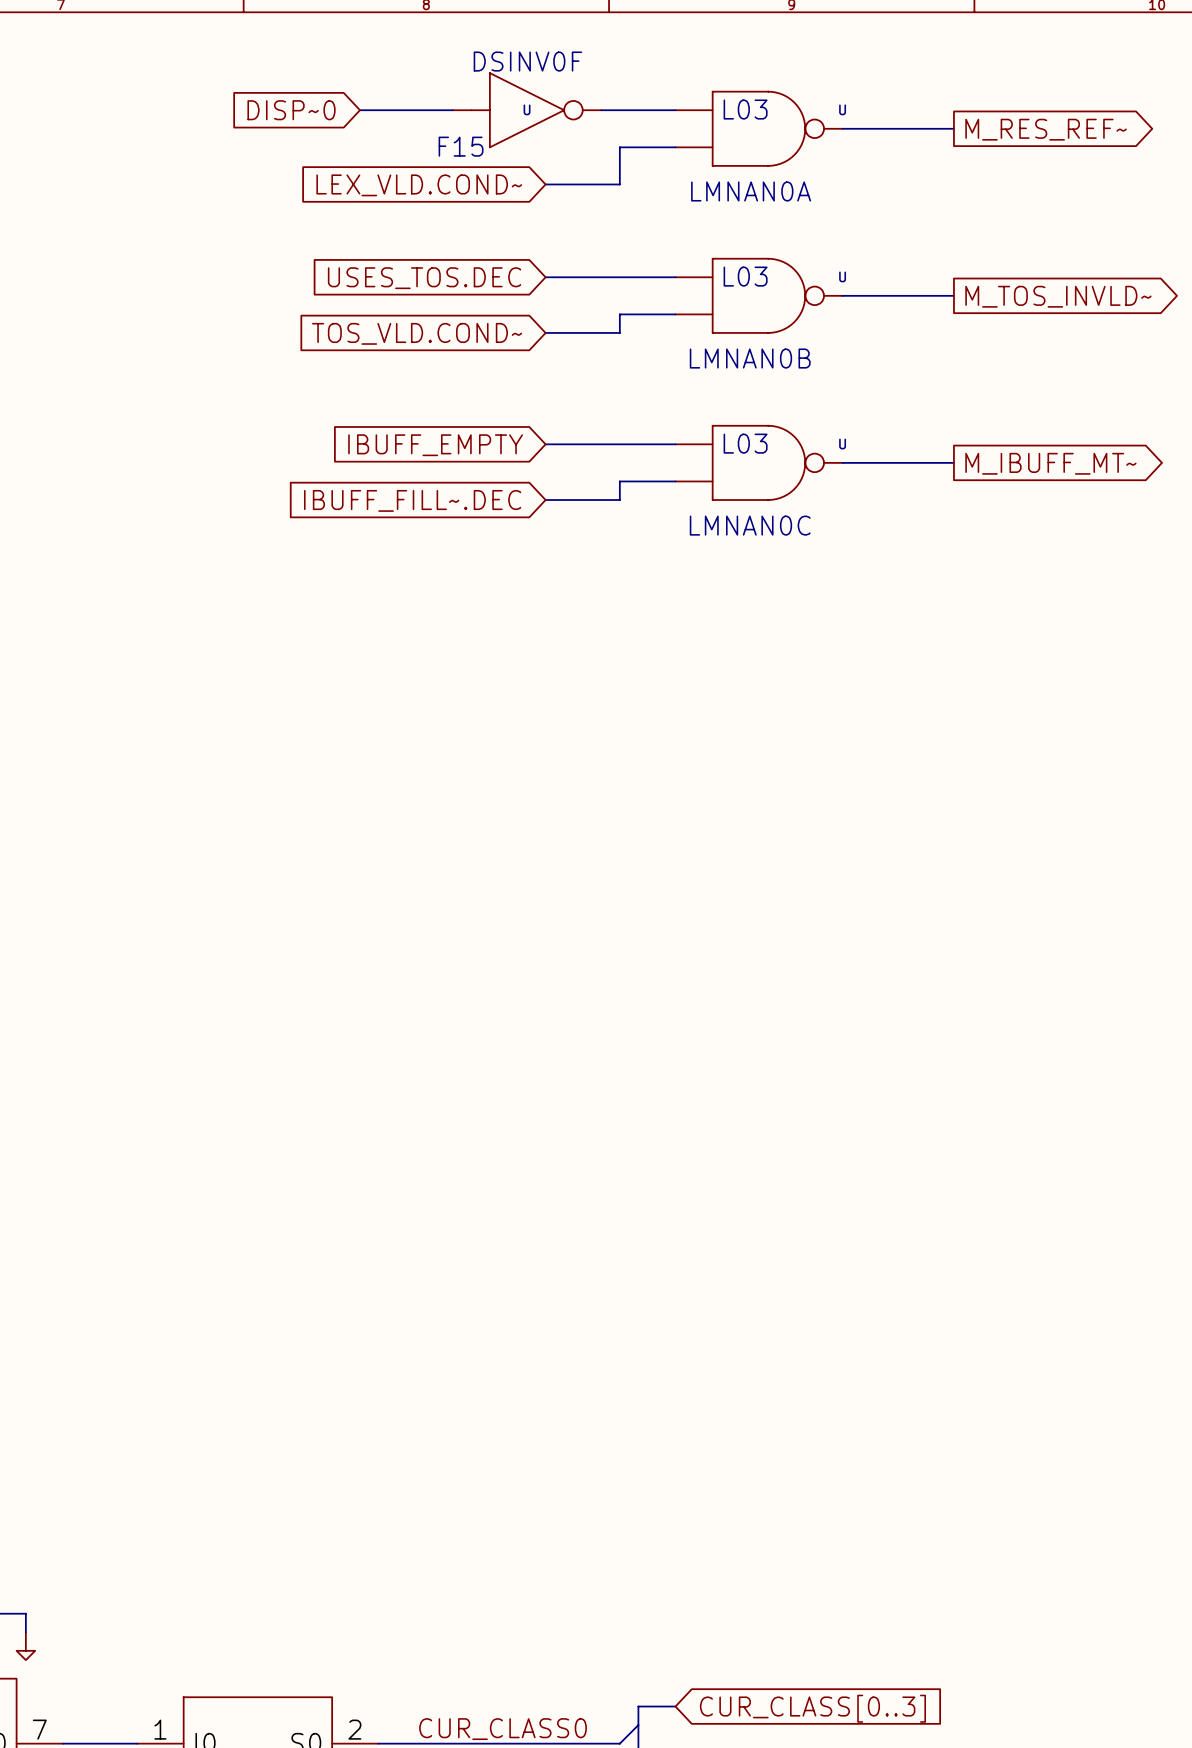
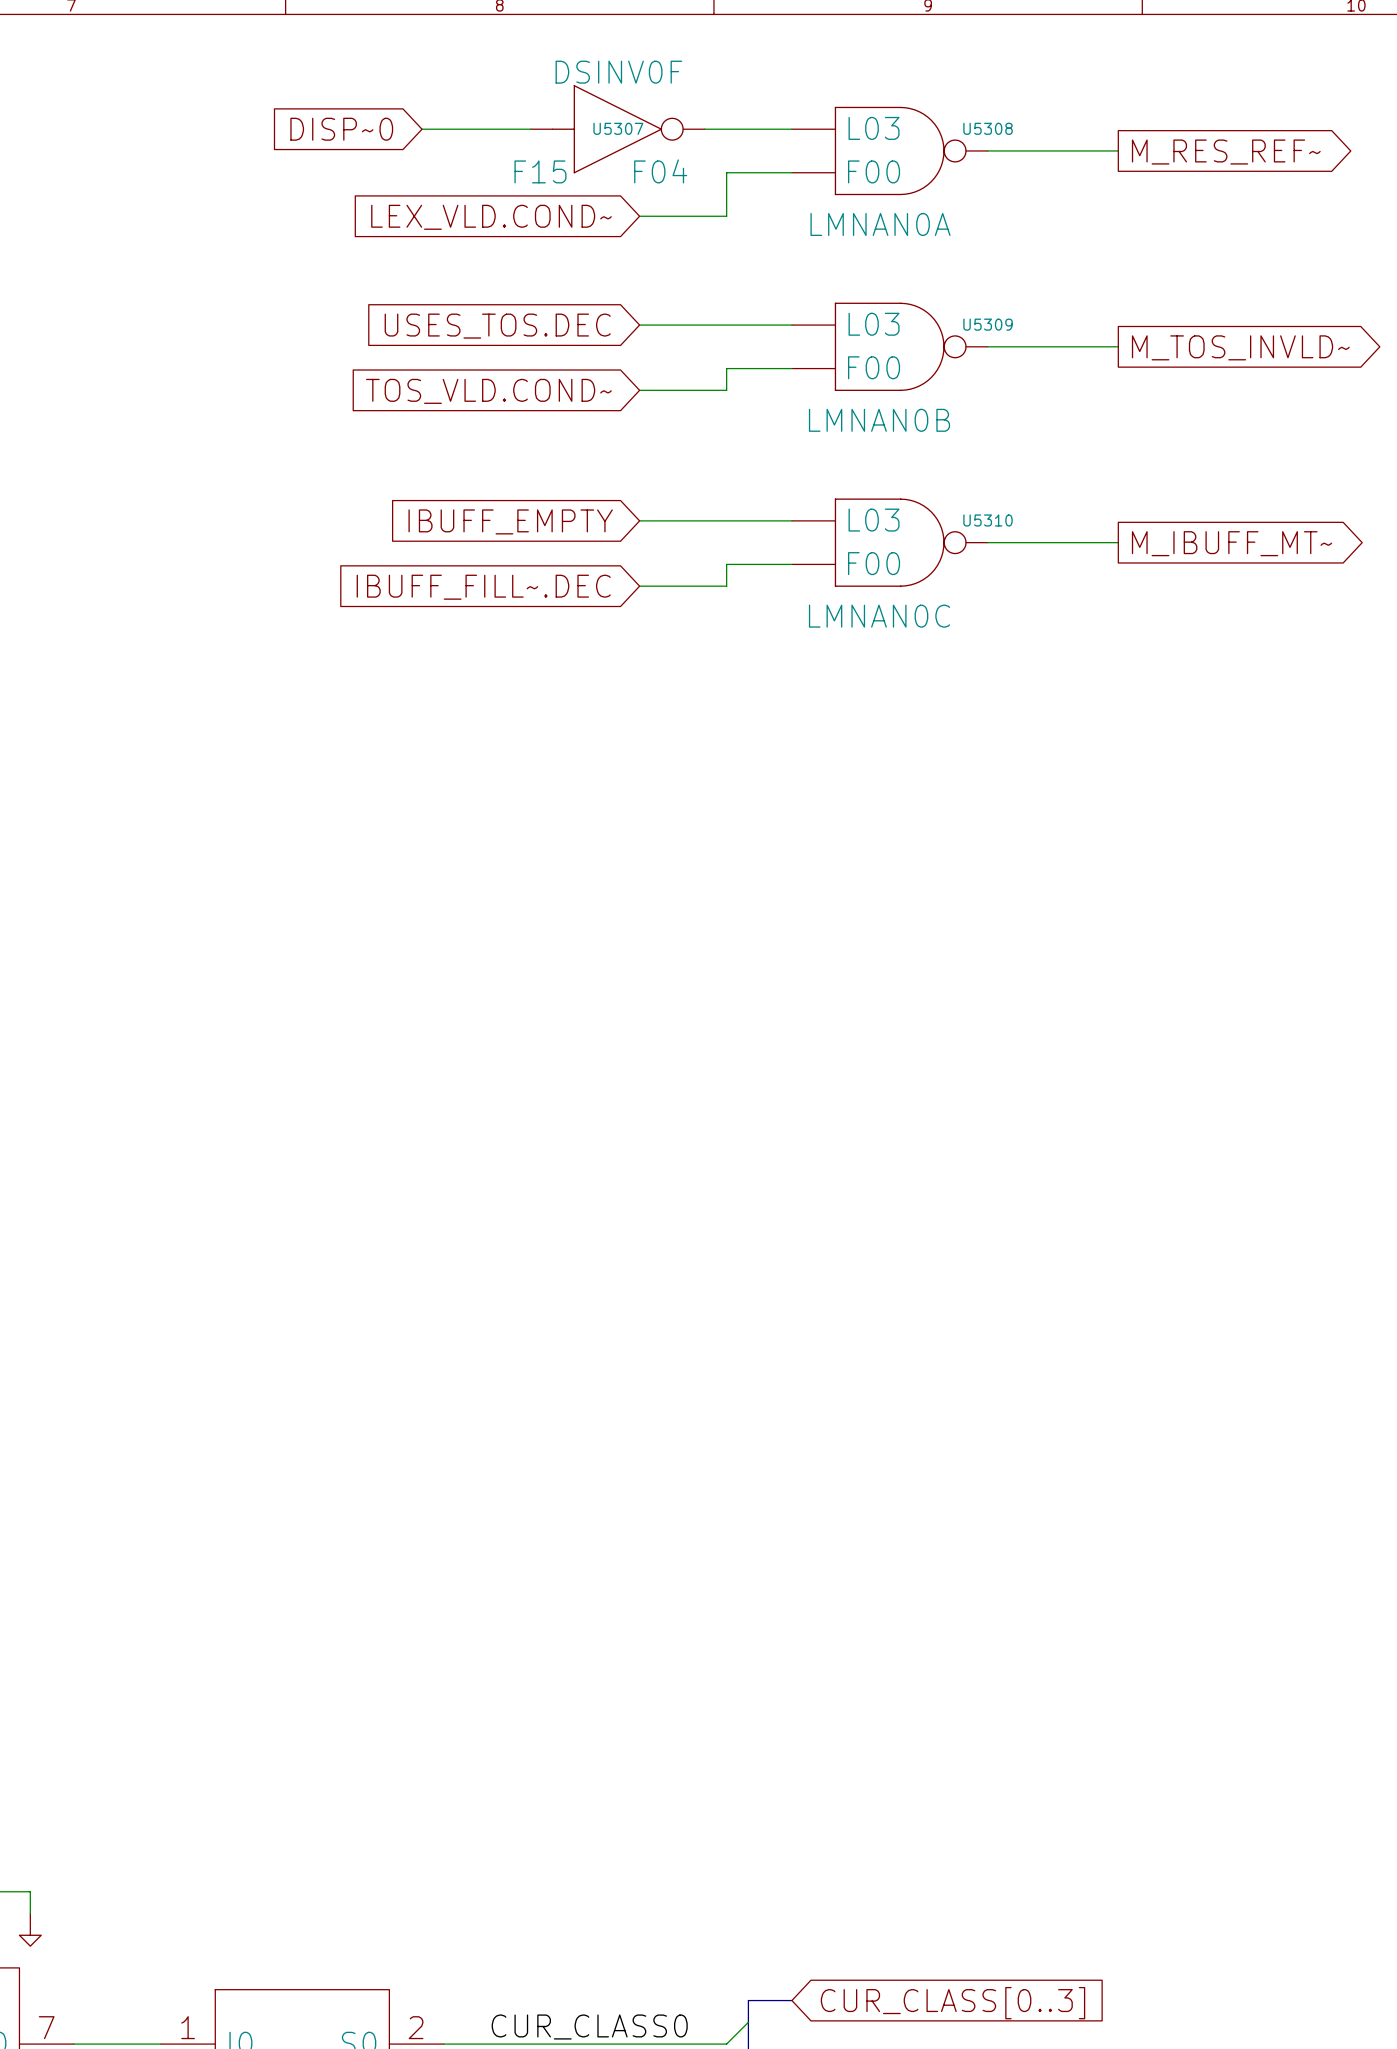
U name: U (527, 109) -> U5307 (618, 128)
U name: U (842, 109) -> U5308 (988, 128)
U value: none -> F04 (660, 171)
U value: none -> F00 (874, 171)
U name: U (842, 276) -> U5309 (988, 324)
U value: none -> F00 (874, 367)
U name: U (842, 443) -> U5310 (988, 520)
U value: none -> F00 (874, 563)

